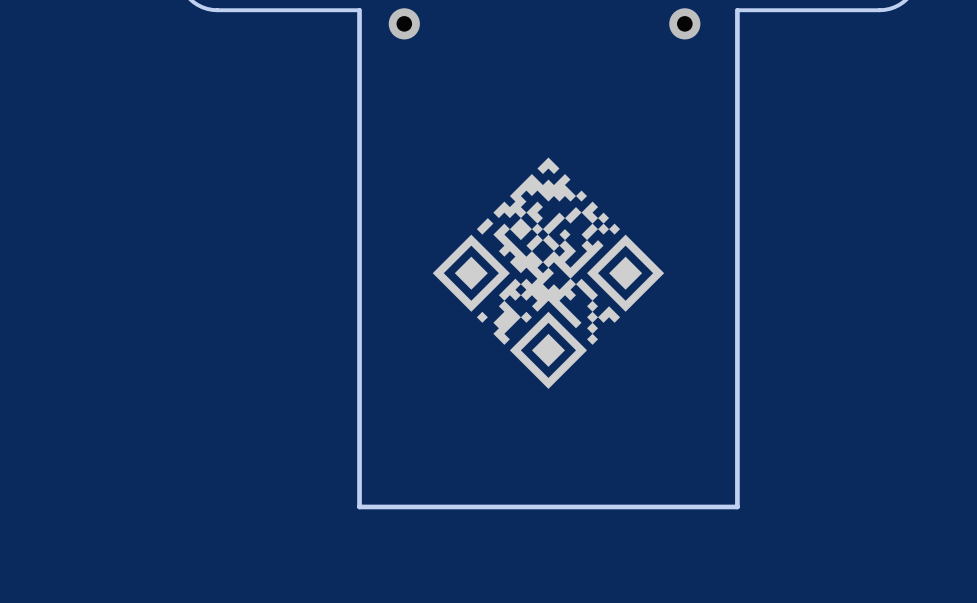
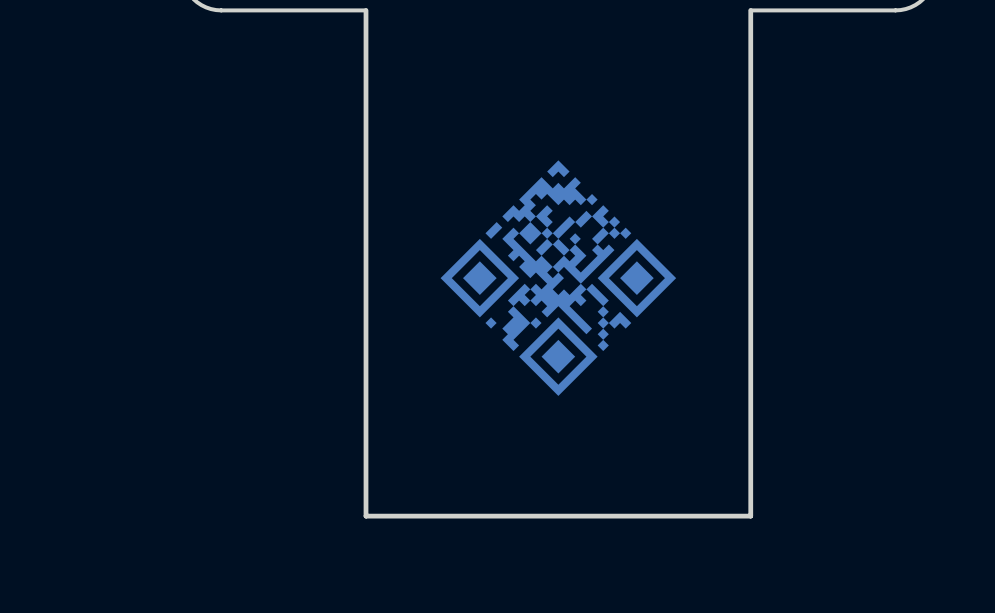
via: (404, 23) -> none
via: (684, 23) -> none

